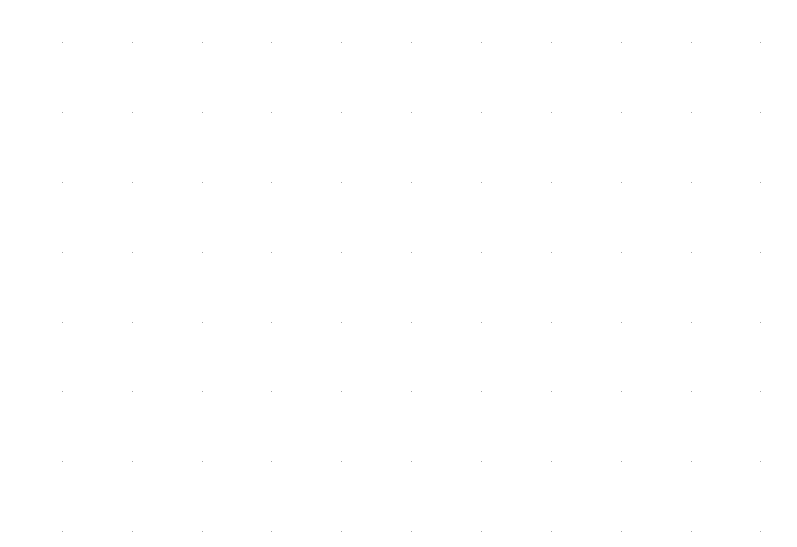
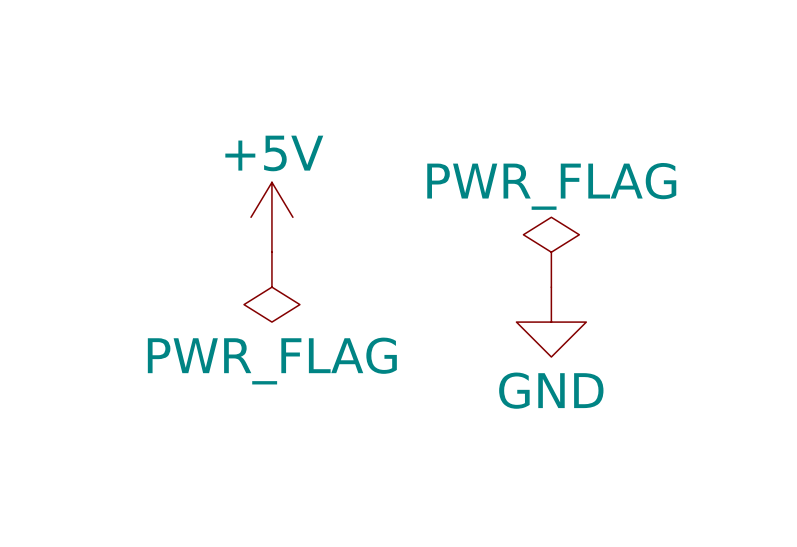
power symbol: none -> +5V (271, 217)
power symbol: none -> PWR_FLAG (551, 252)
power symbol: none -> PWR_FLAG (271, 287)
power symbol: none -> GND (551, 322)

